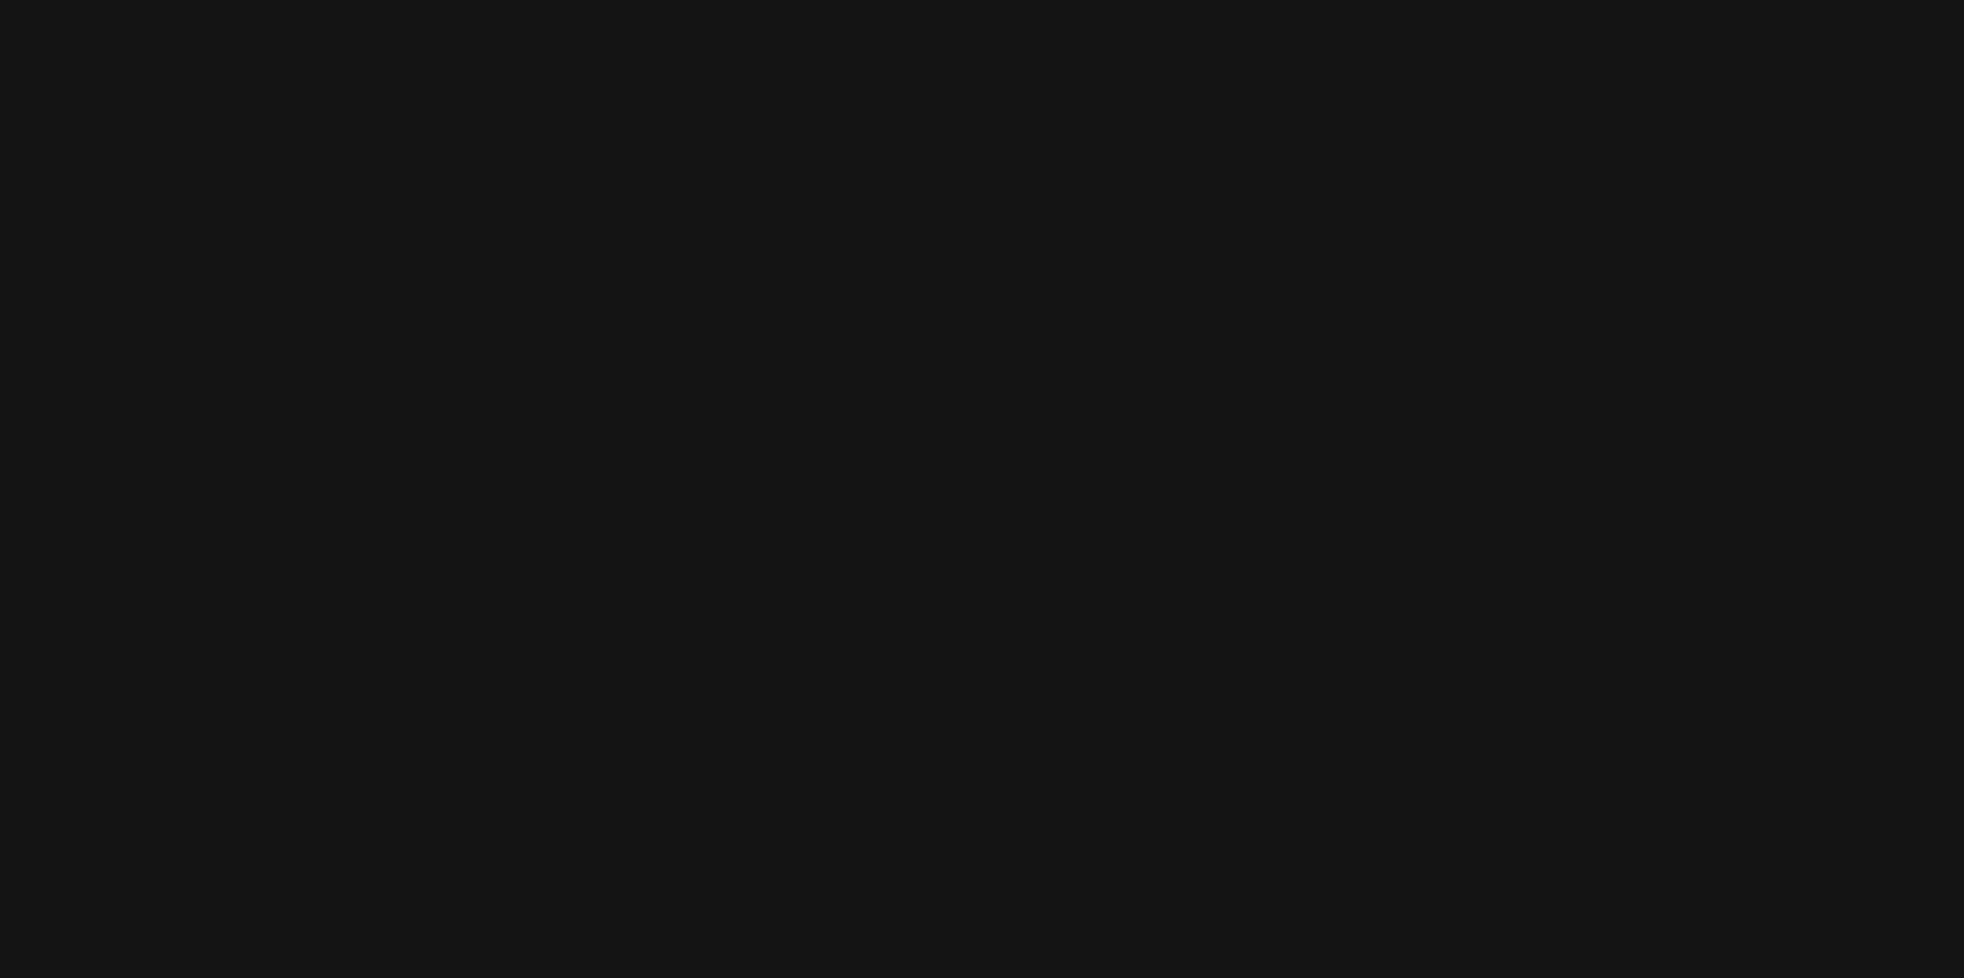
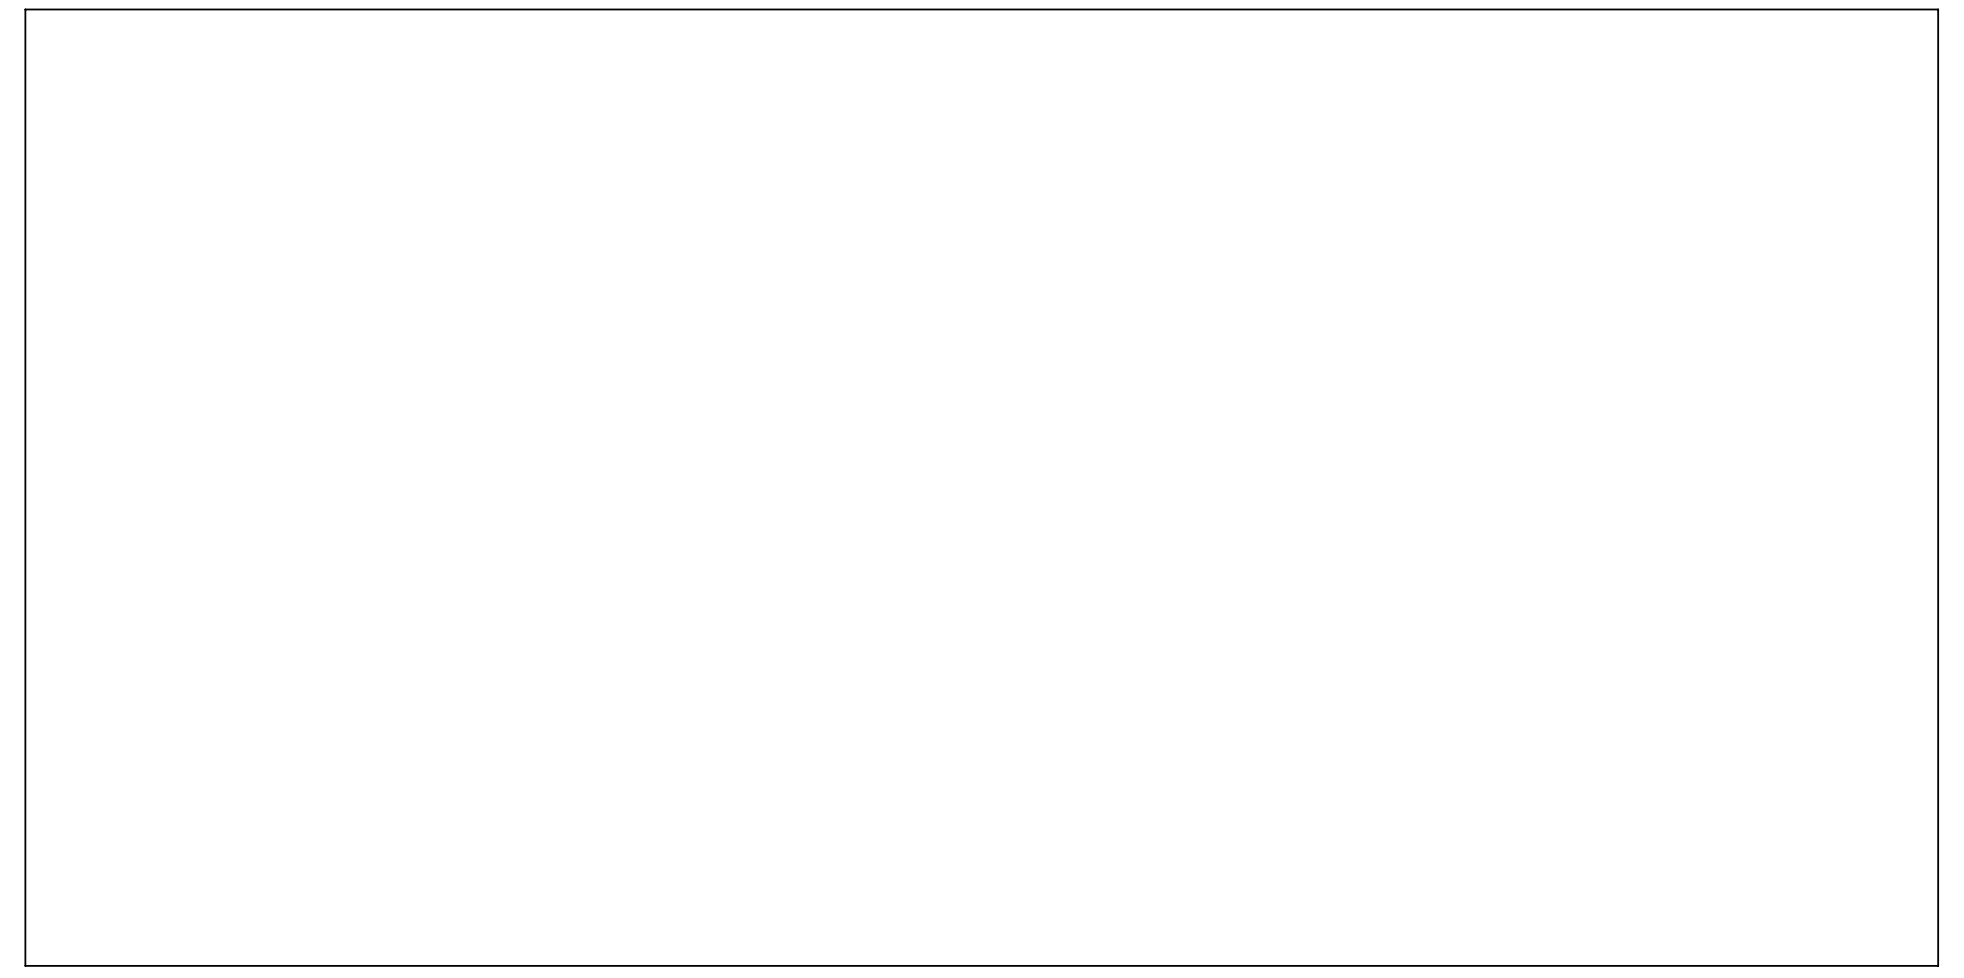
board edge: none -> (25, 9) (1938, 9) (1938, 965) (25, 965) (25, 9)

